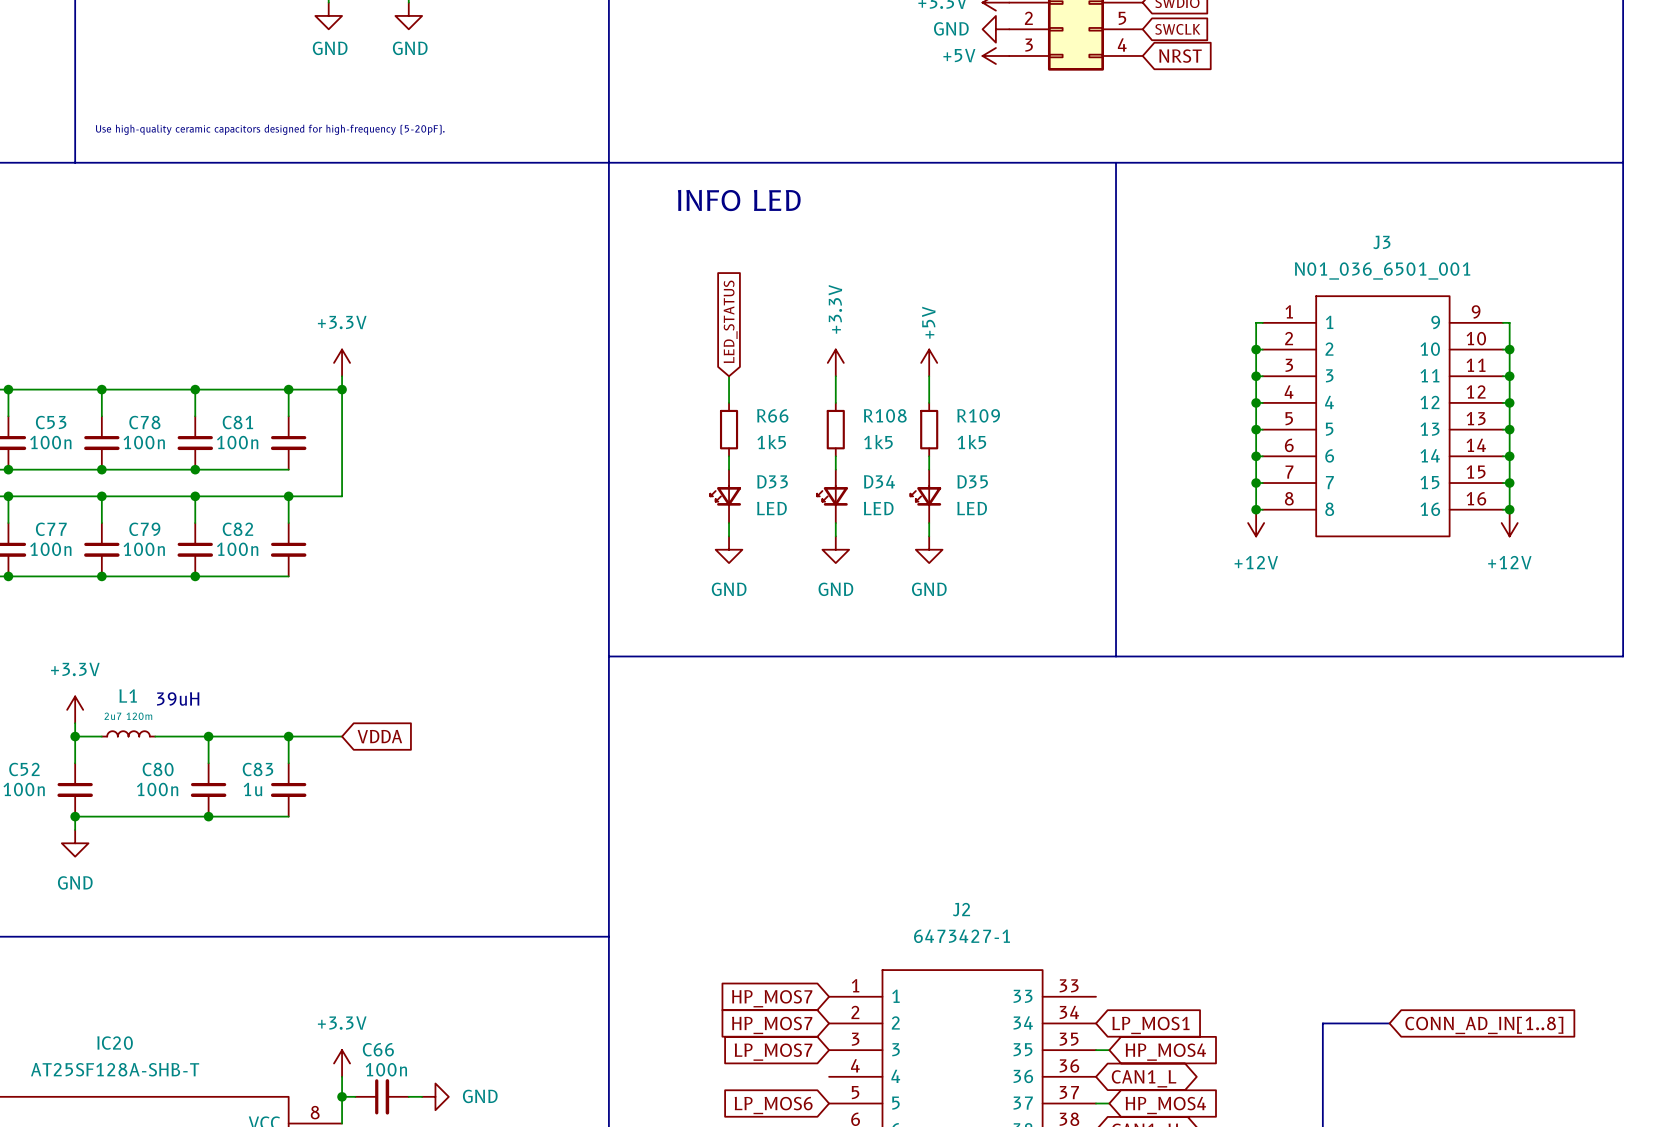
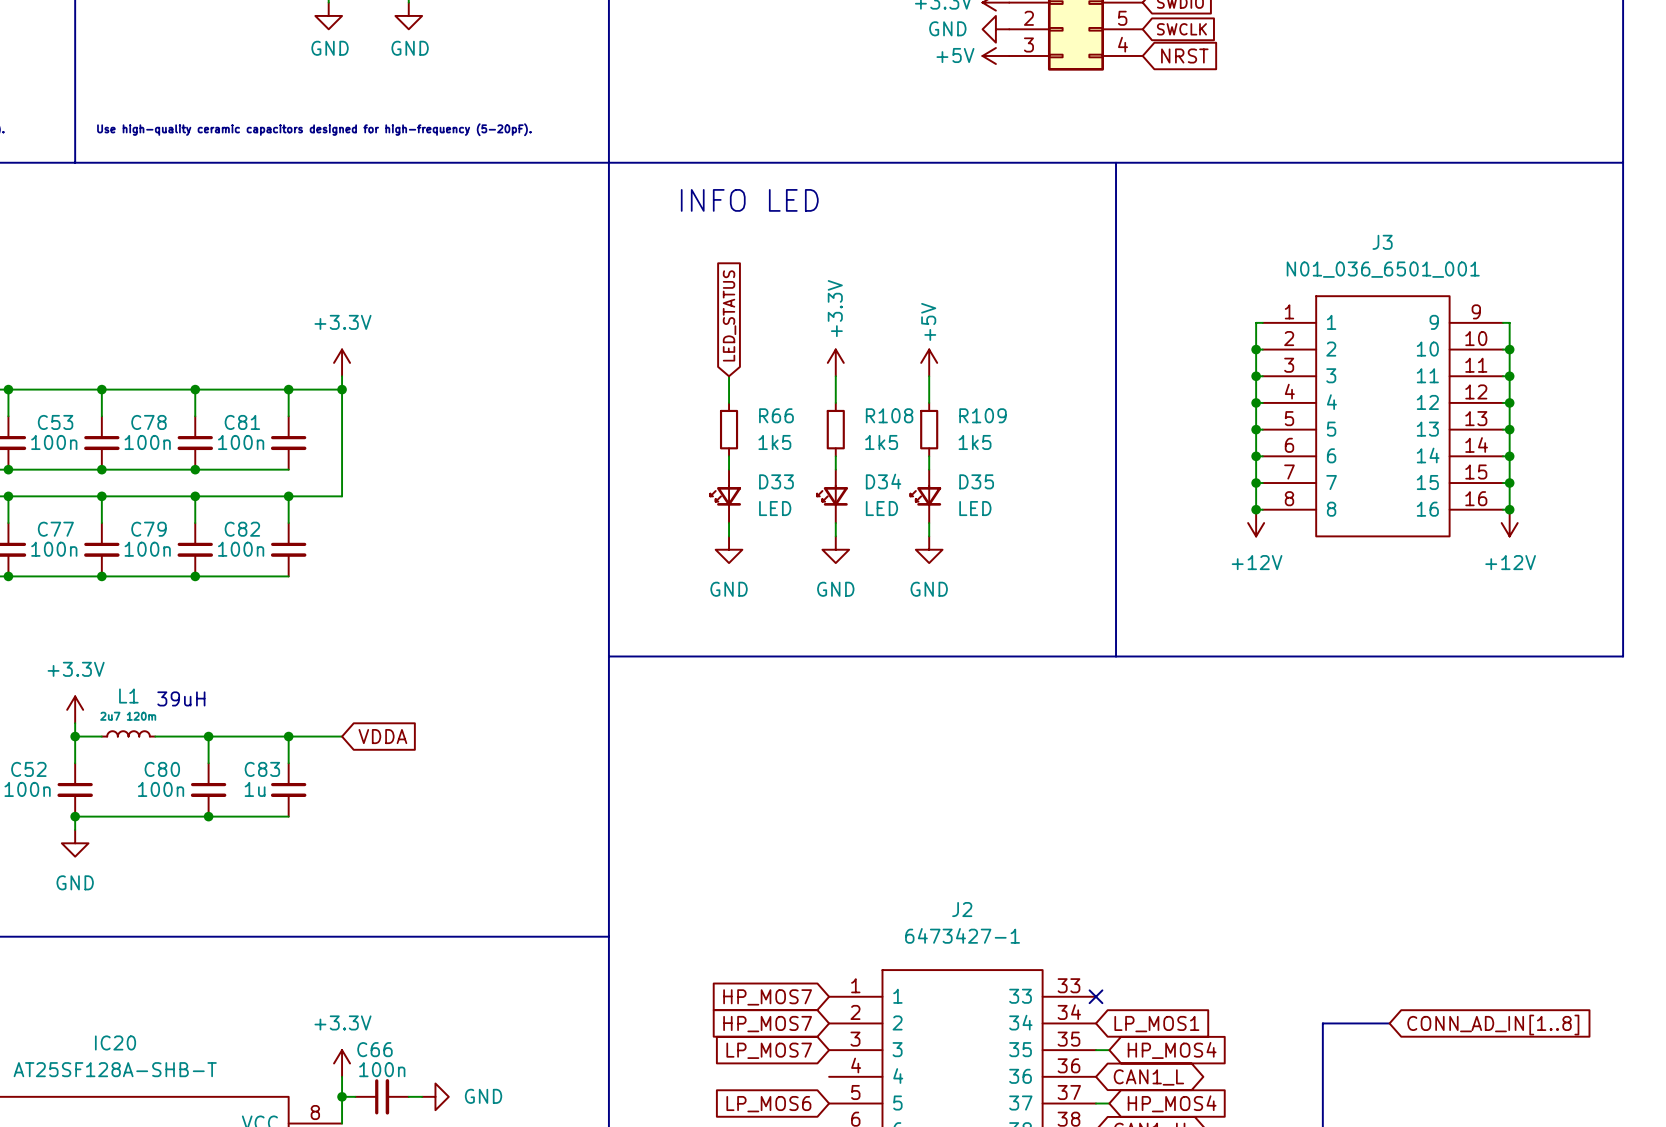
no-connect mark: none -> (1095, 996)

